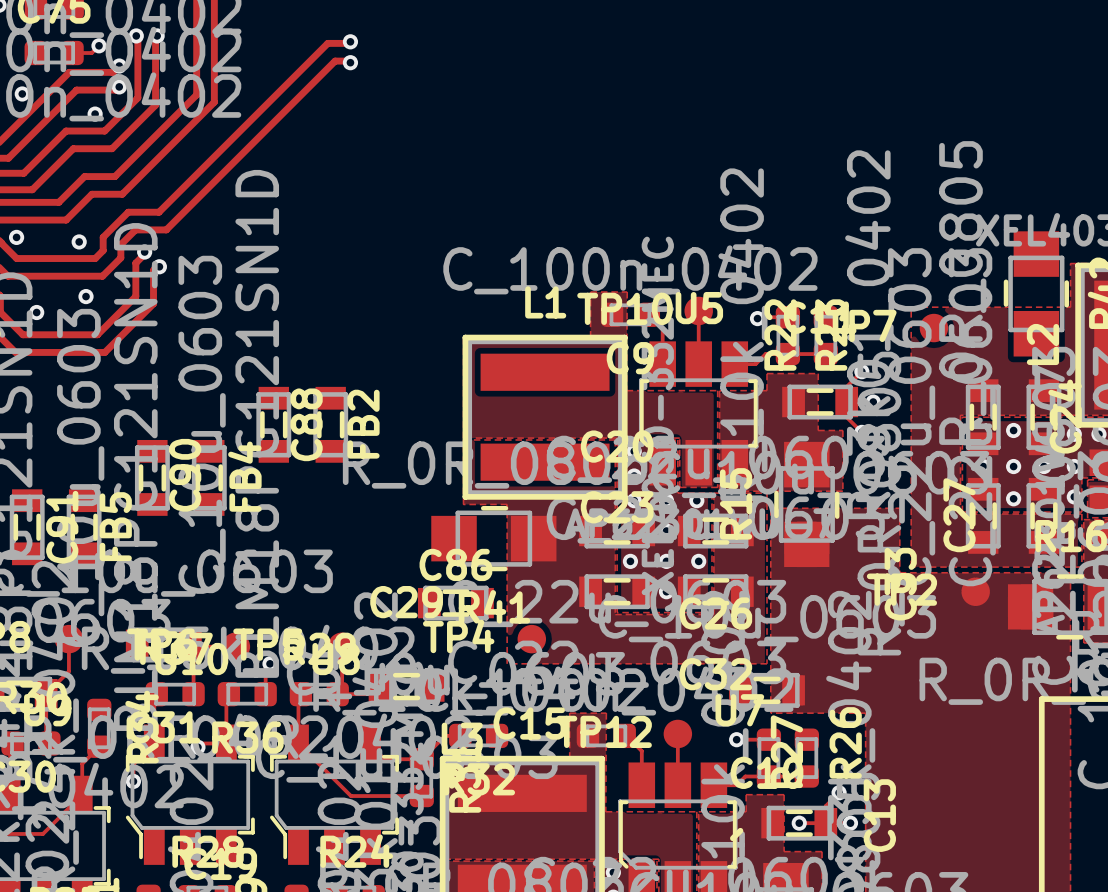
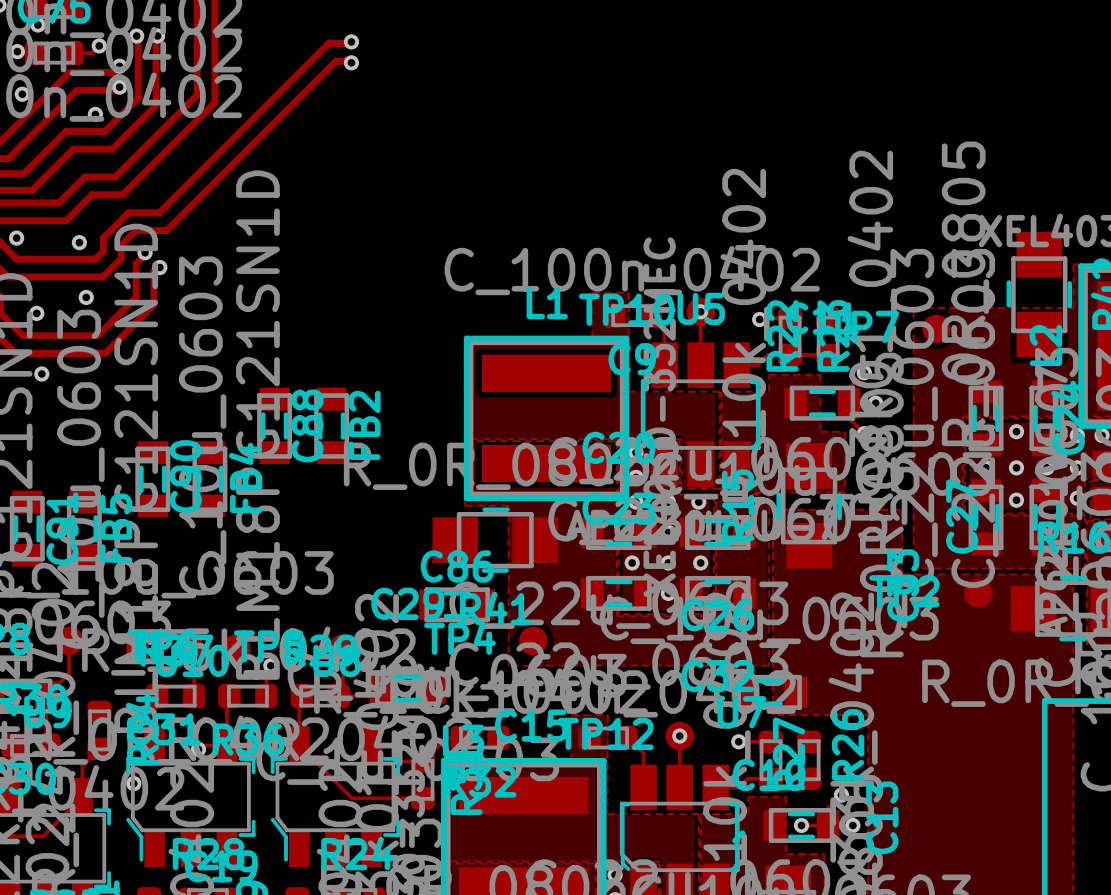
via: none -> (37, 25)
via: none -> (17, 51)
via: none -> (700, 311)
via: none -> (41, 373)
via: none -> (679, 736)

